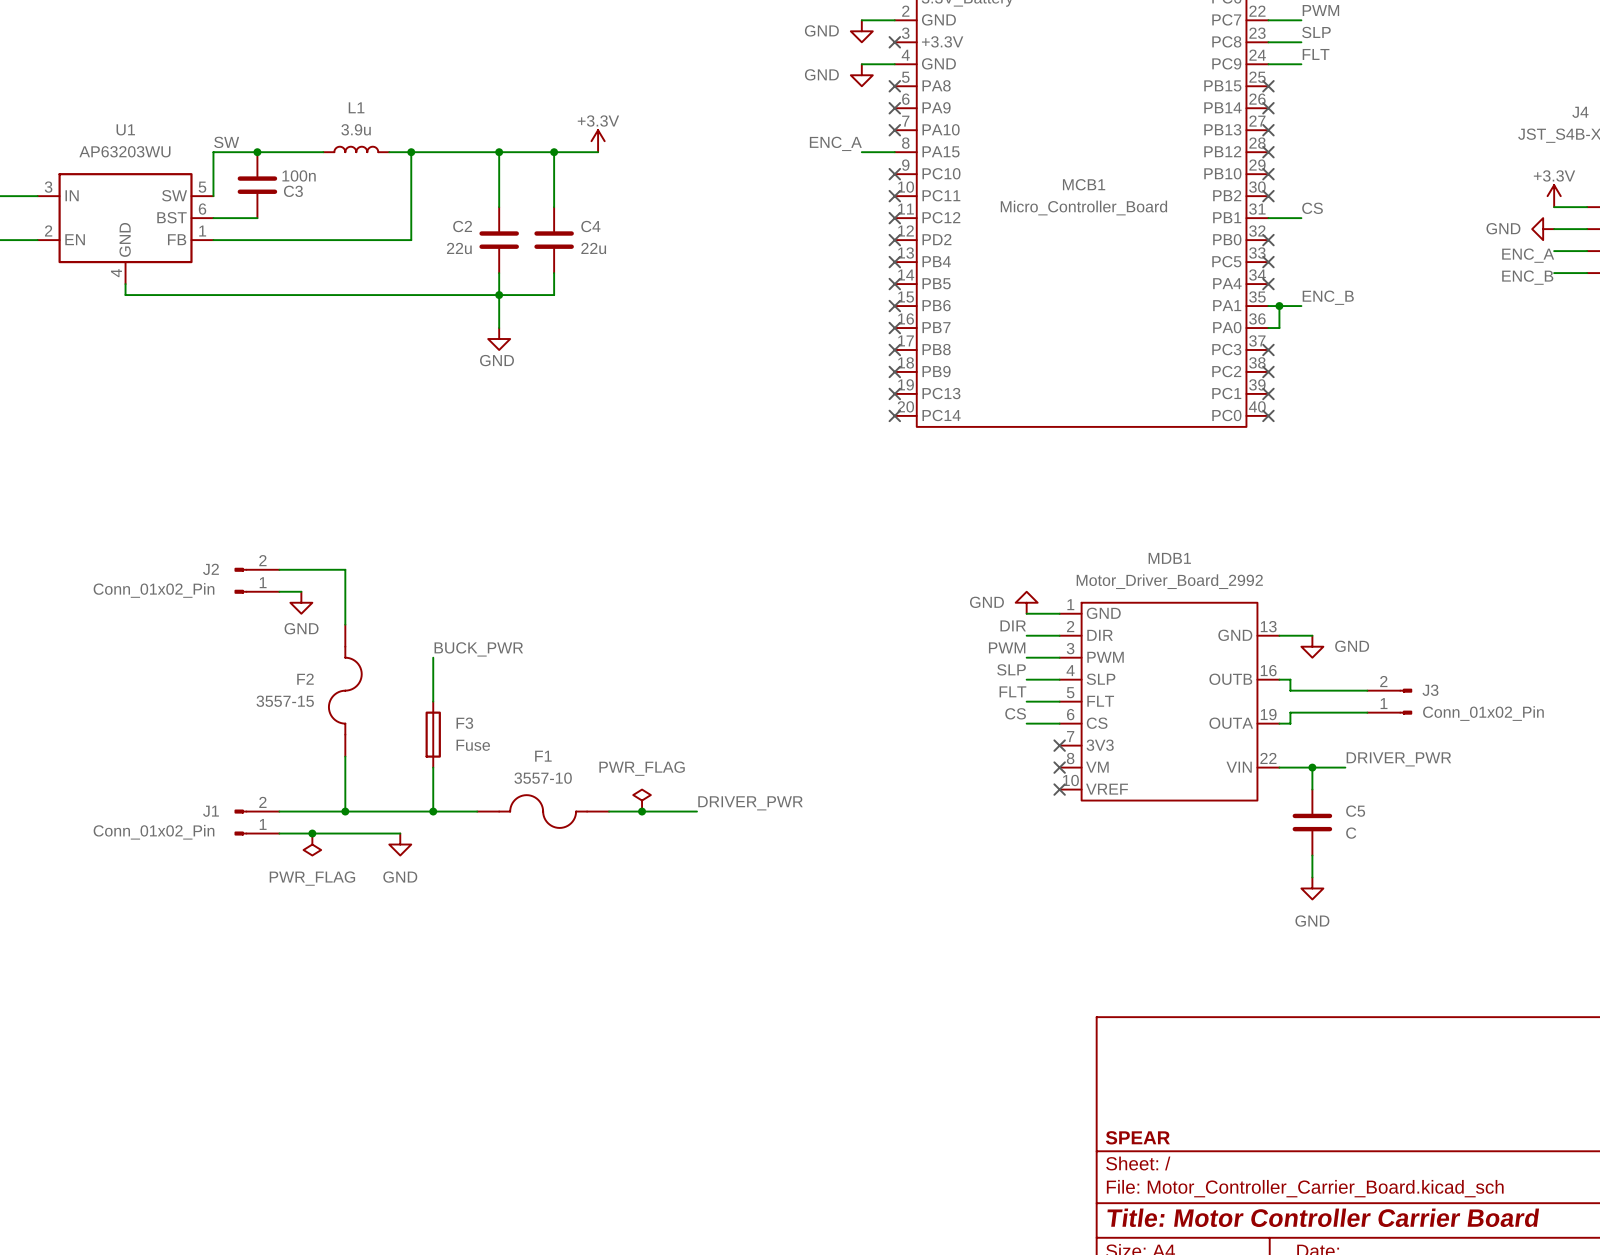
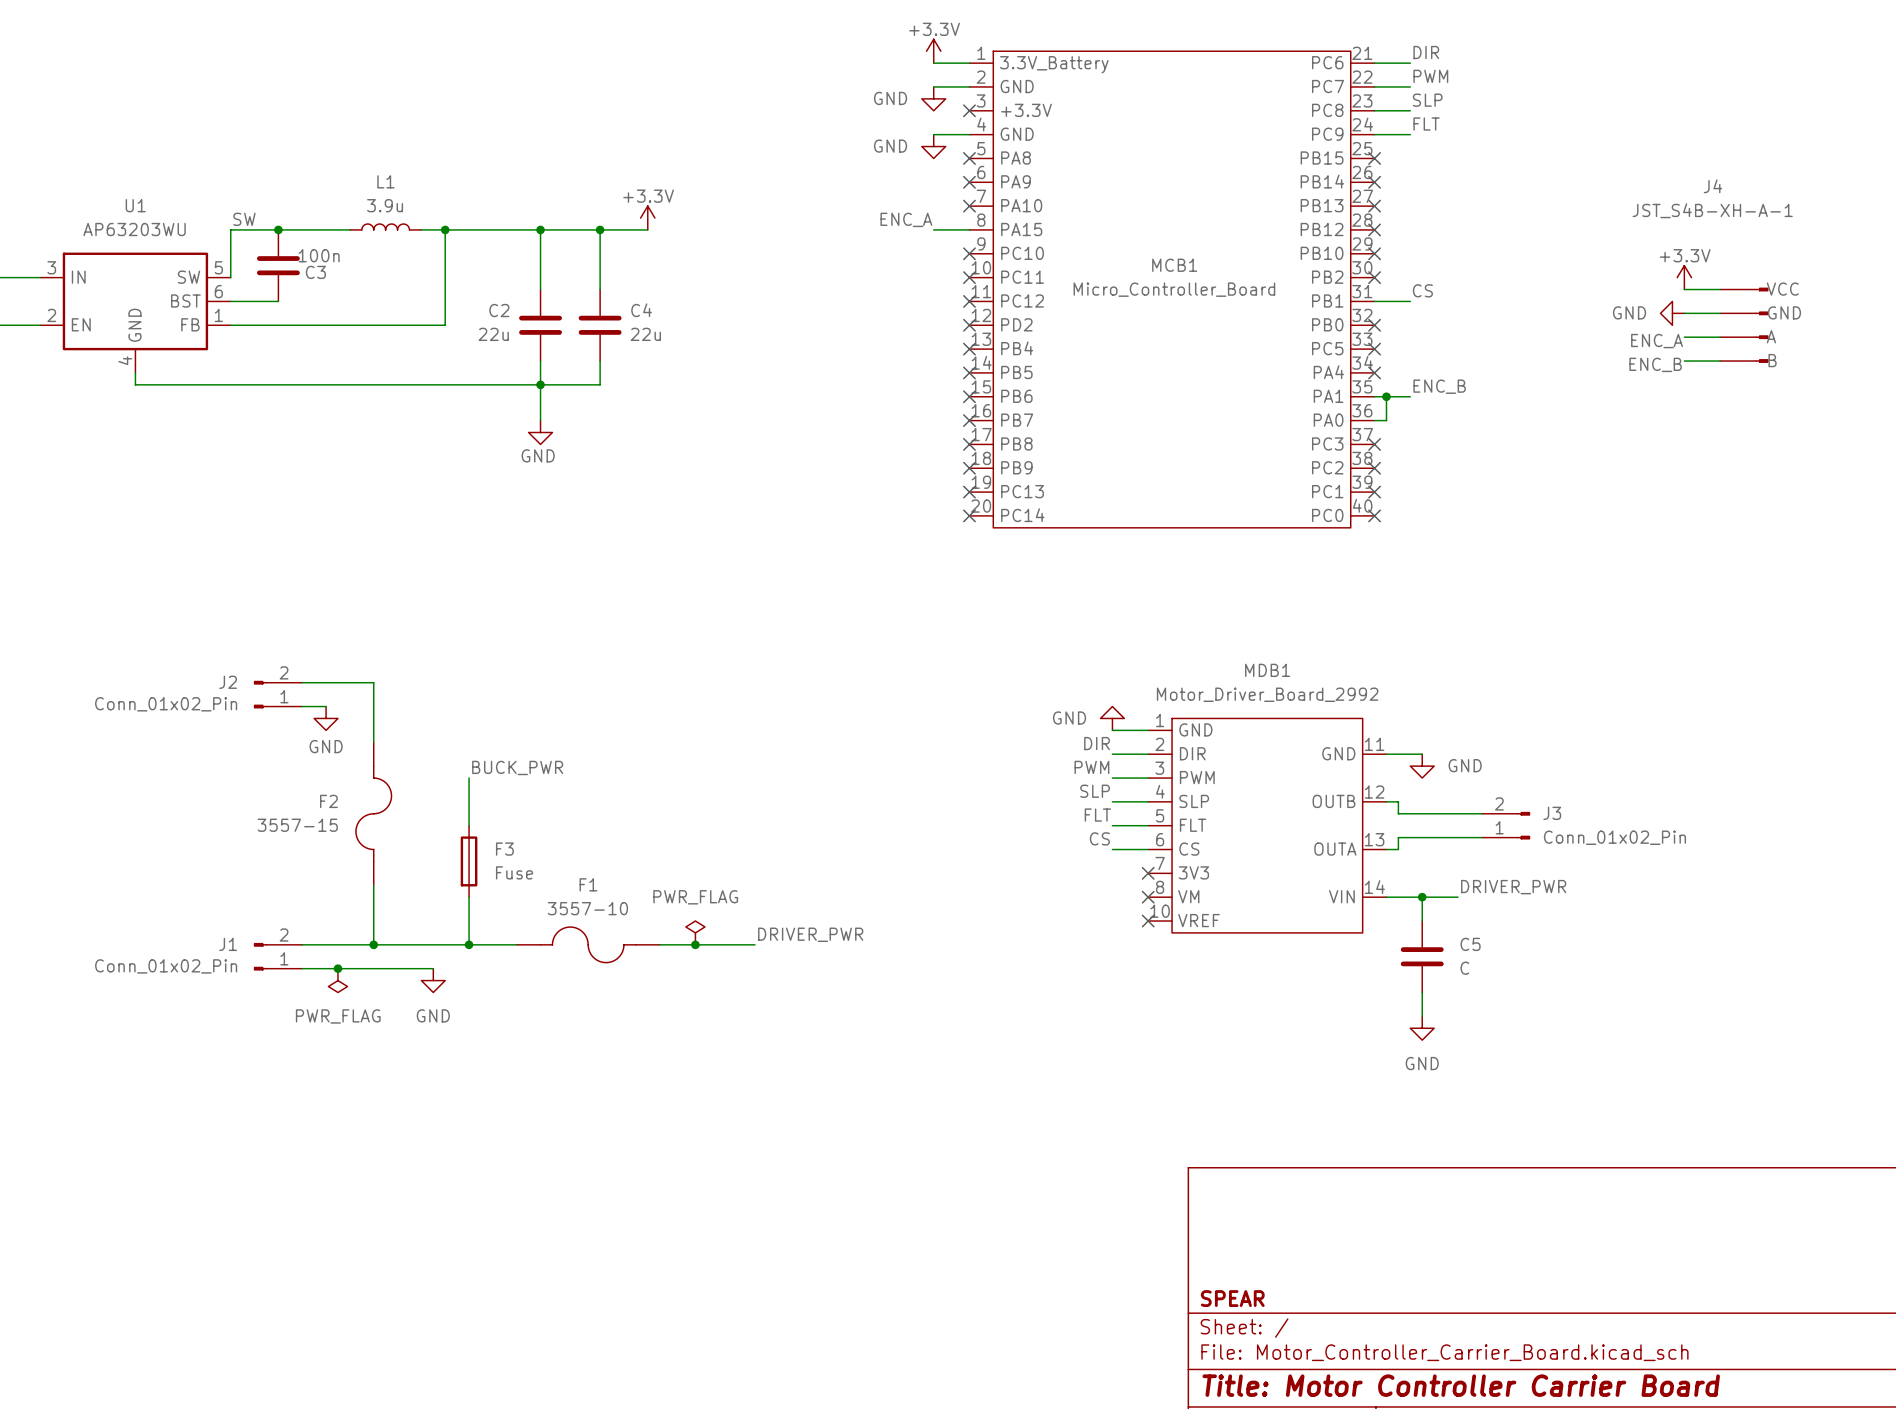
MDB1 pin number: 13 (1268, 626) -> 11 (1374, 744)
MDB1 pin number: 16 (1268, 670) -> 12 (1374, 792)
MDB1 pin number: 19 (1268, 714) -> 13 (1374, 839)
MDB1 pin number: 22 (1268, 758) -> 14 (1374, 887)

